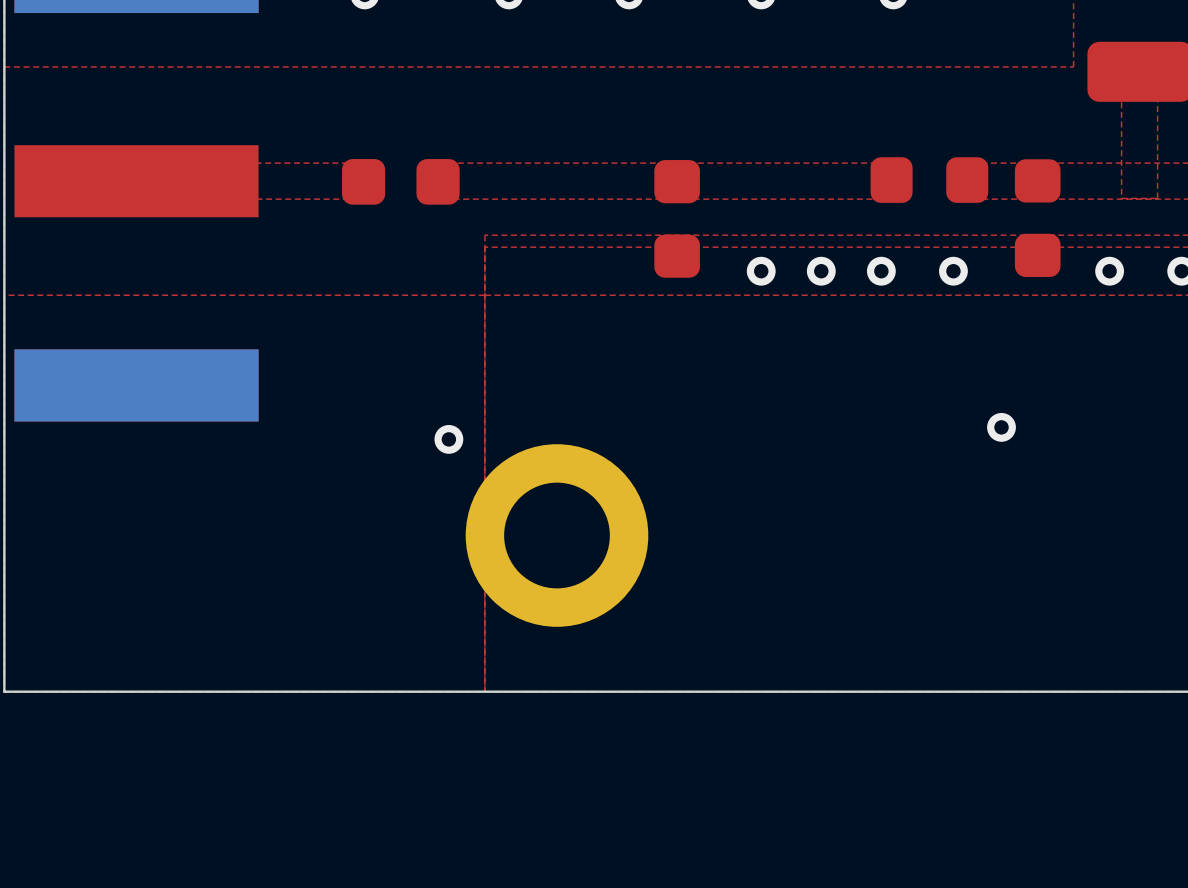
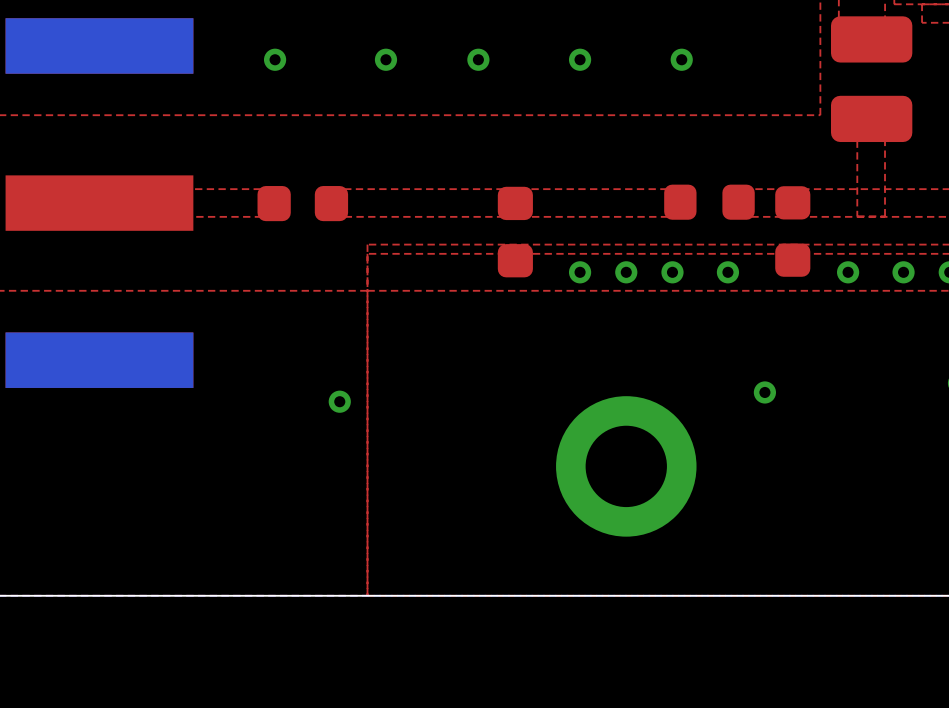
part position: (557, 535) -> (626, 466)

